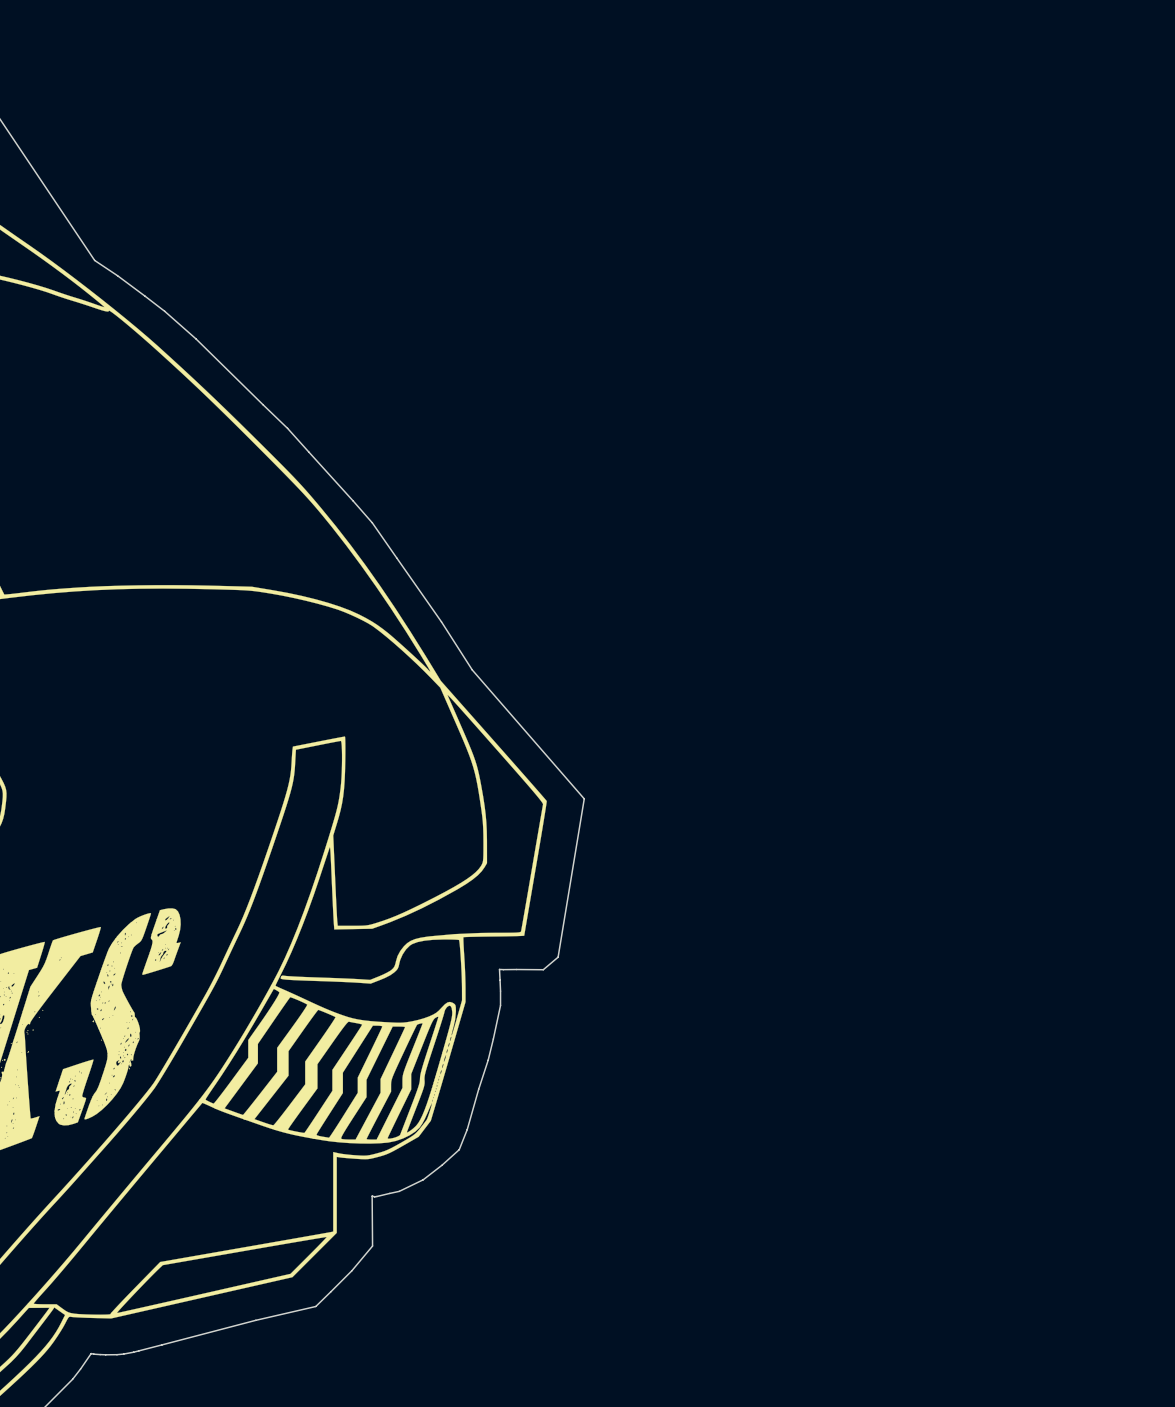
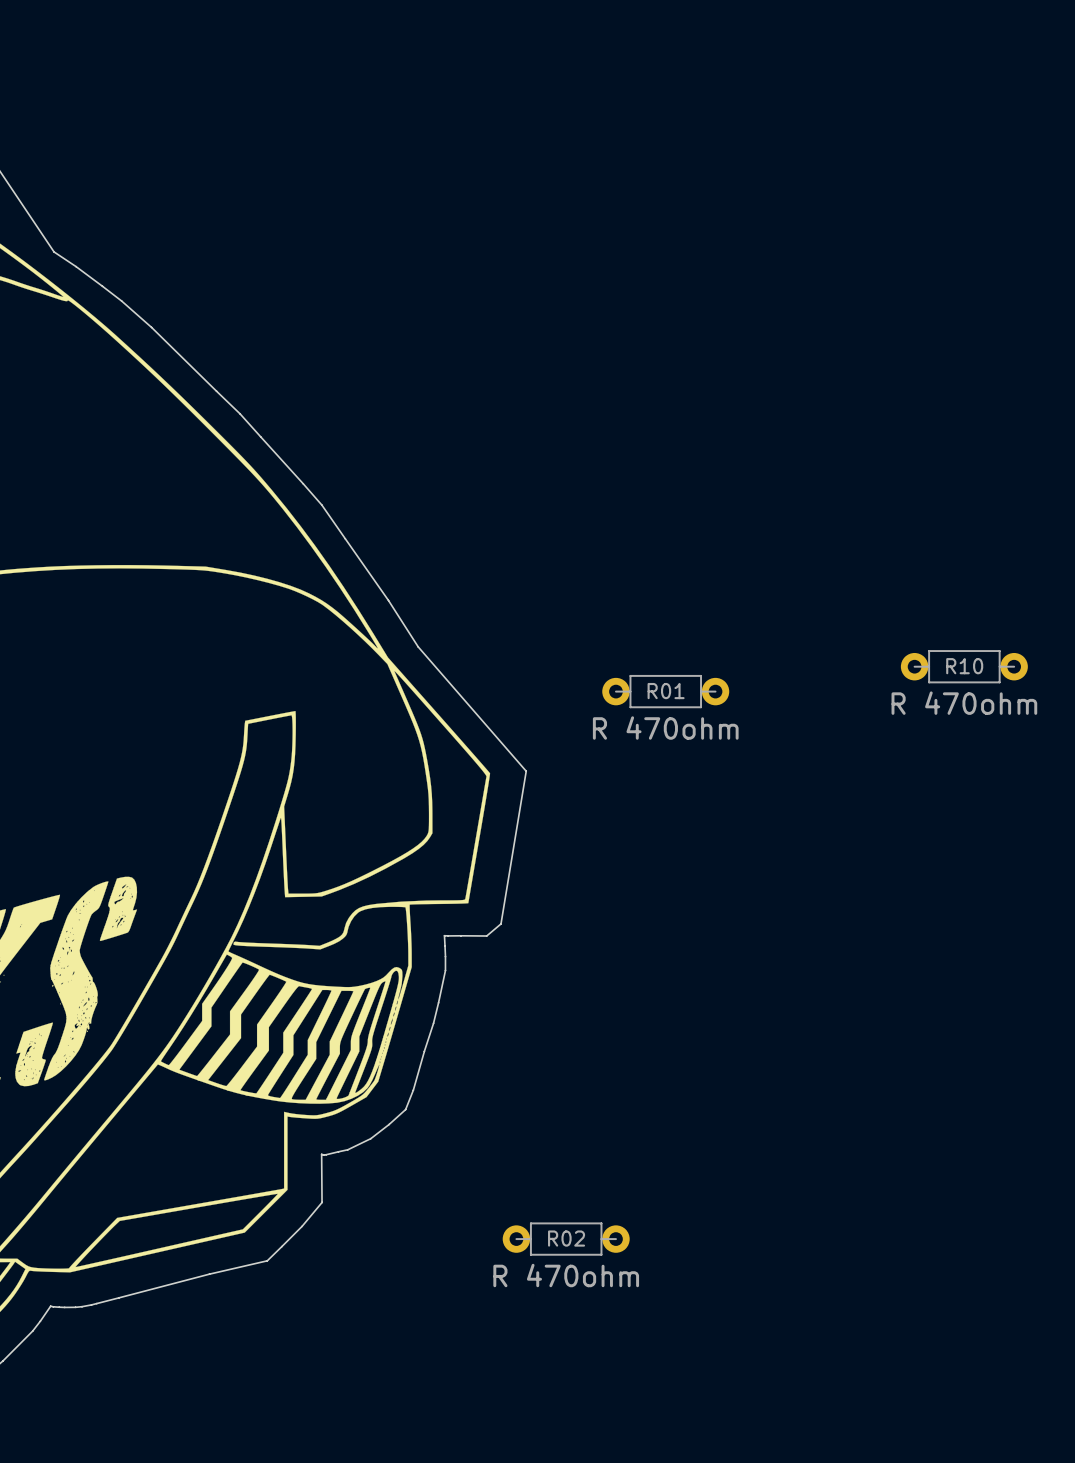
R10: none -> R 470ohm (964, 666)
R01: none -> R 470ohm (665, 691)
R02: none -> R 470ohm (566, 1239)

